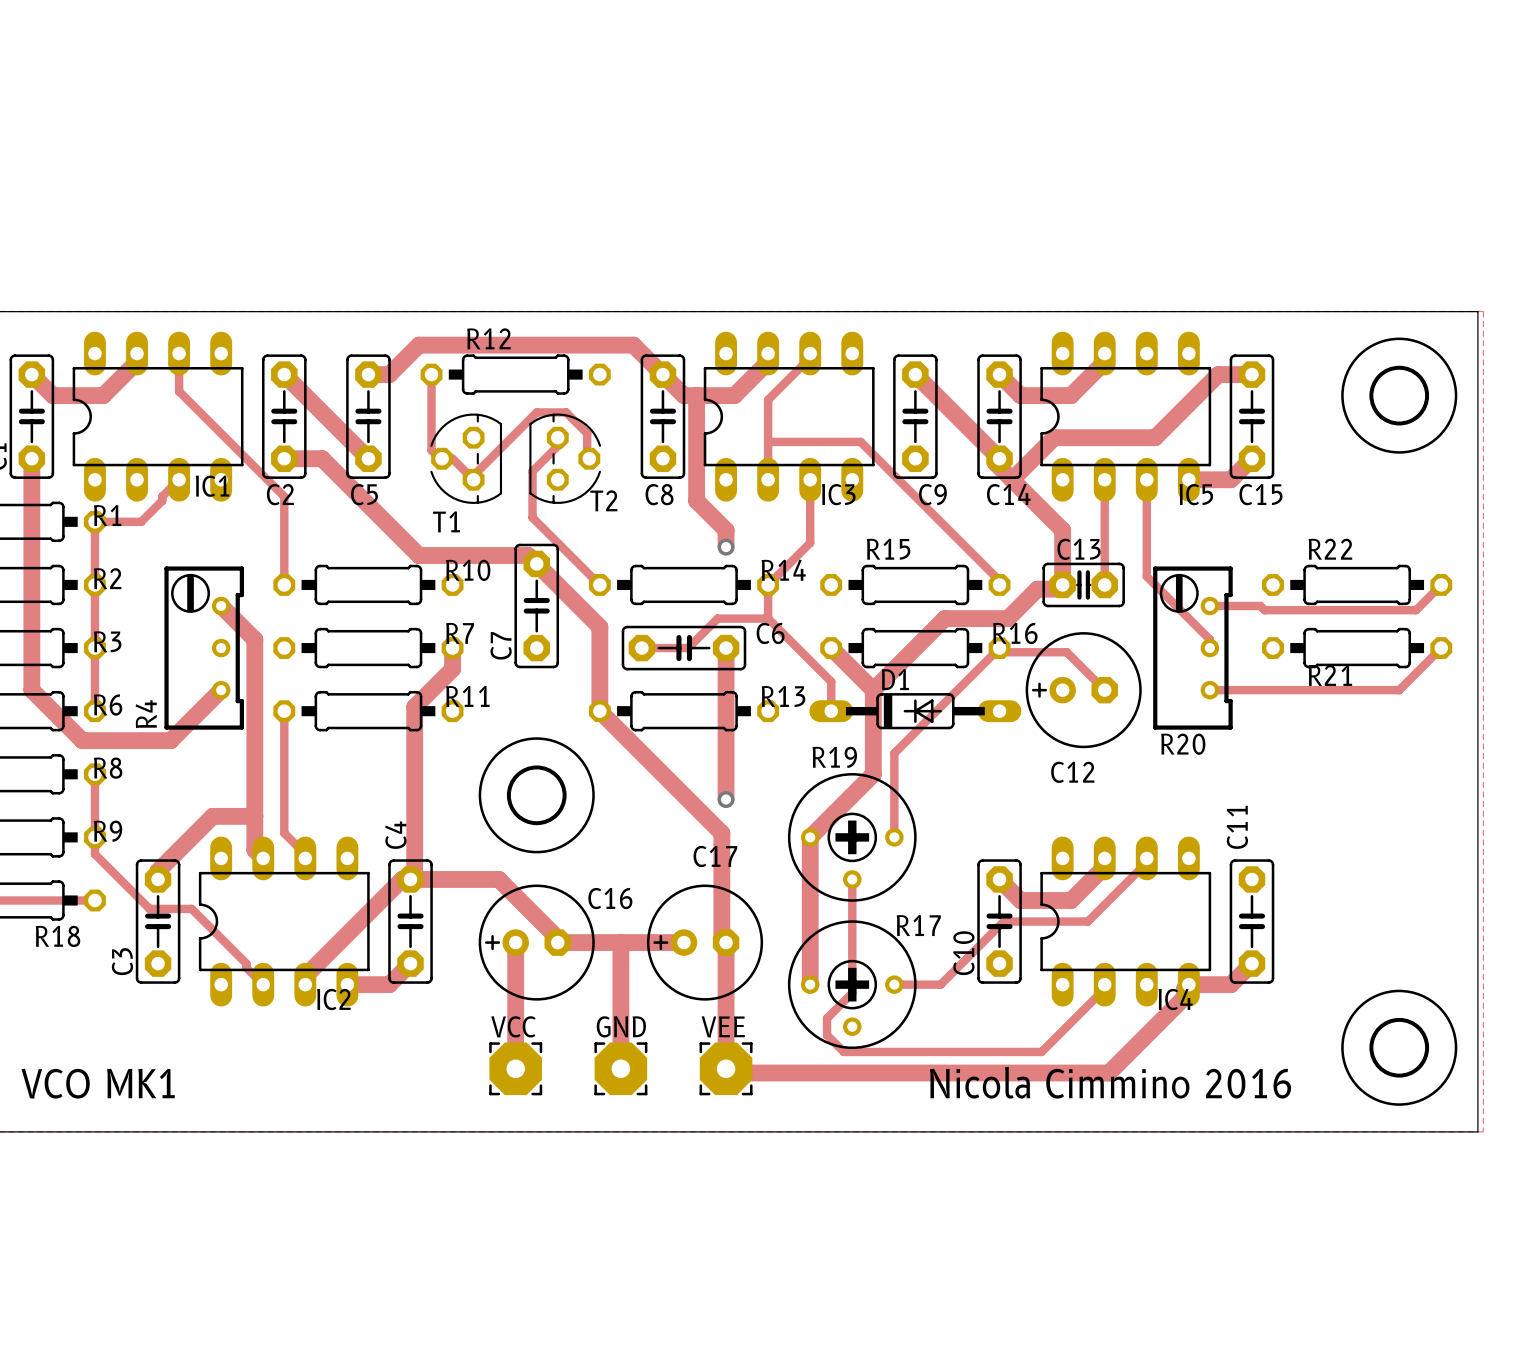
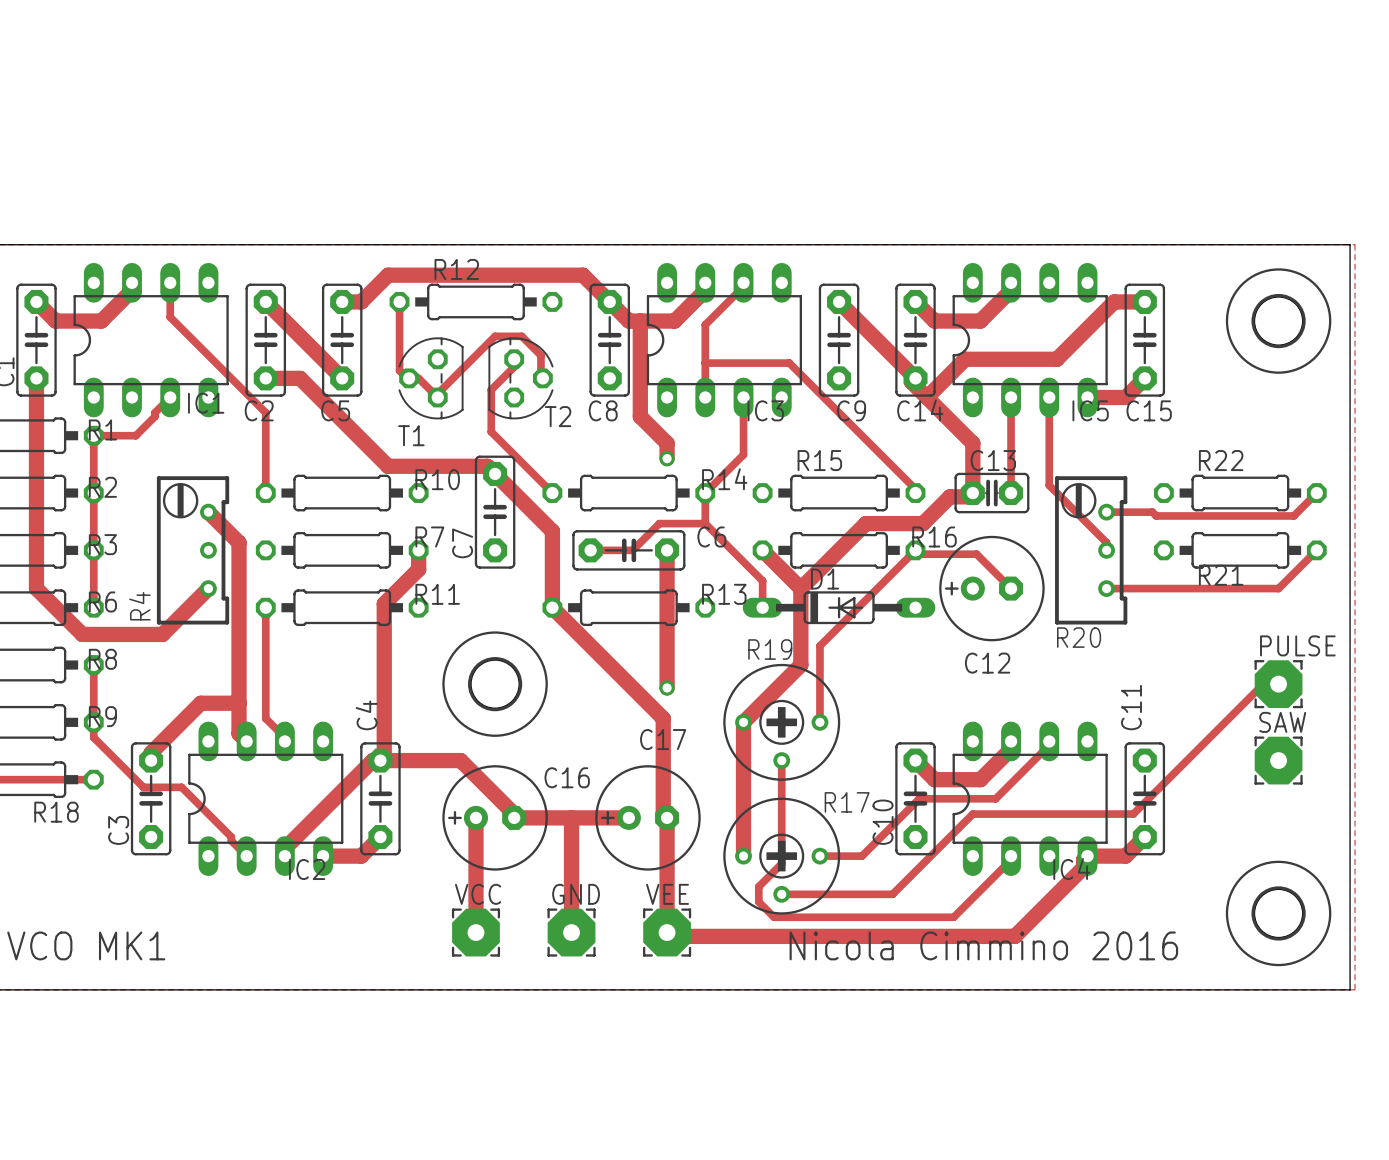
track: none -> (1278, 684) (1263, 684) (1133, 814) (972, 814) (892, 894) (781, 894)
PULSE: none -> (1278, 684)
SAW: none -> (1278, 760)

